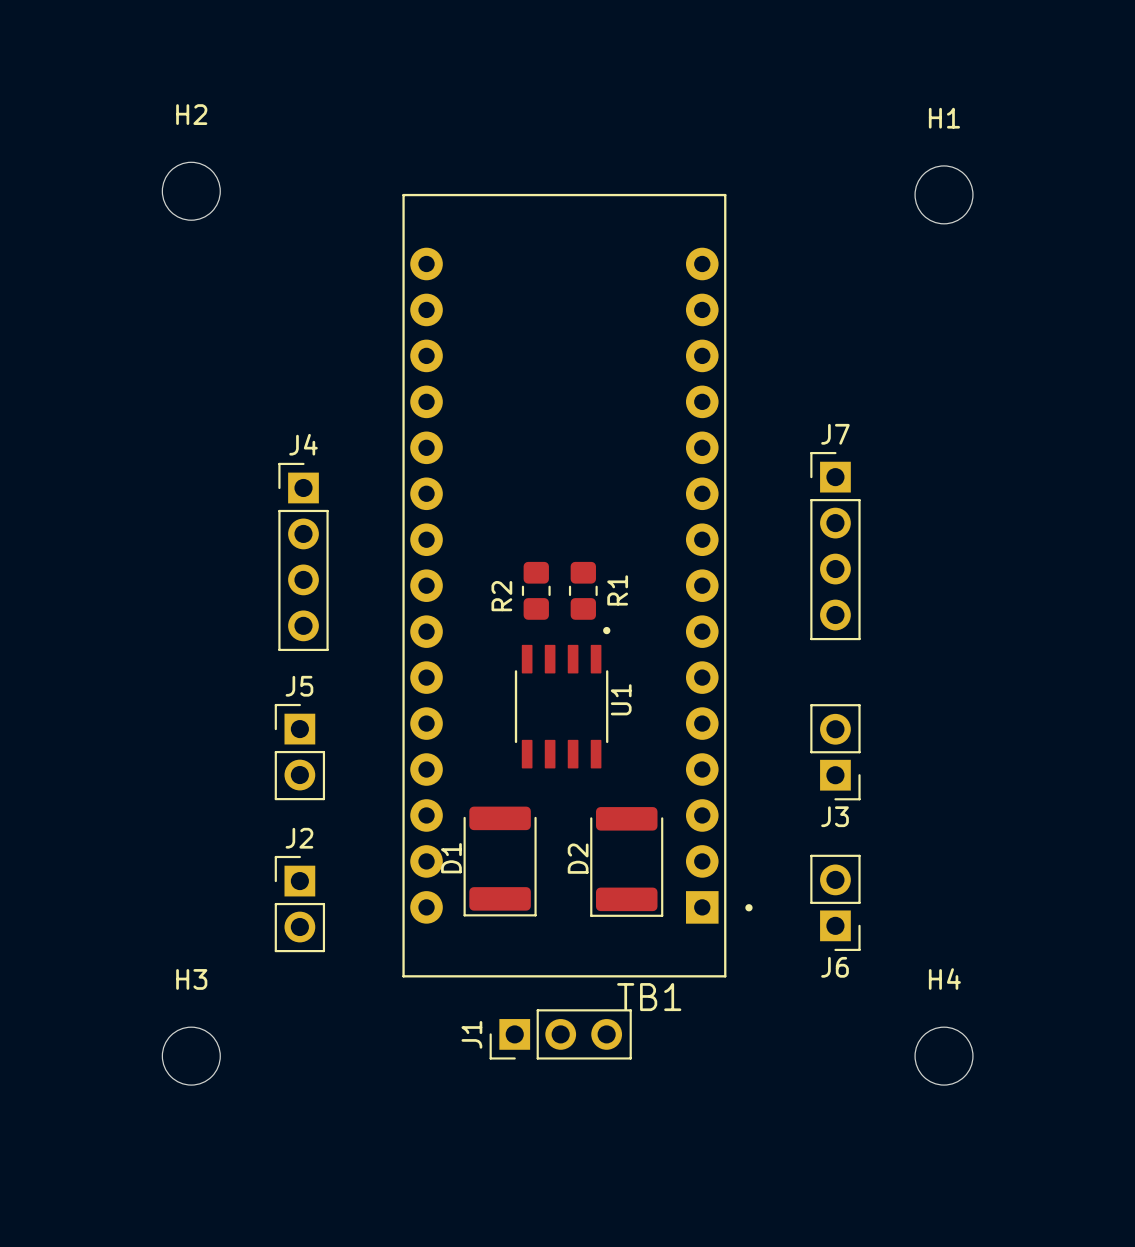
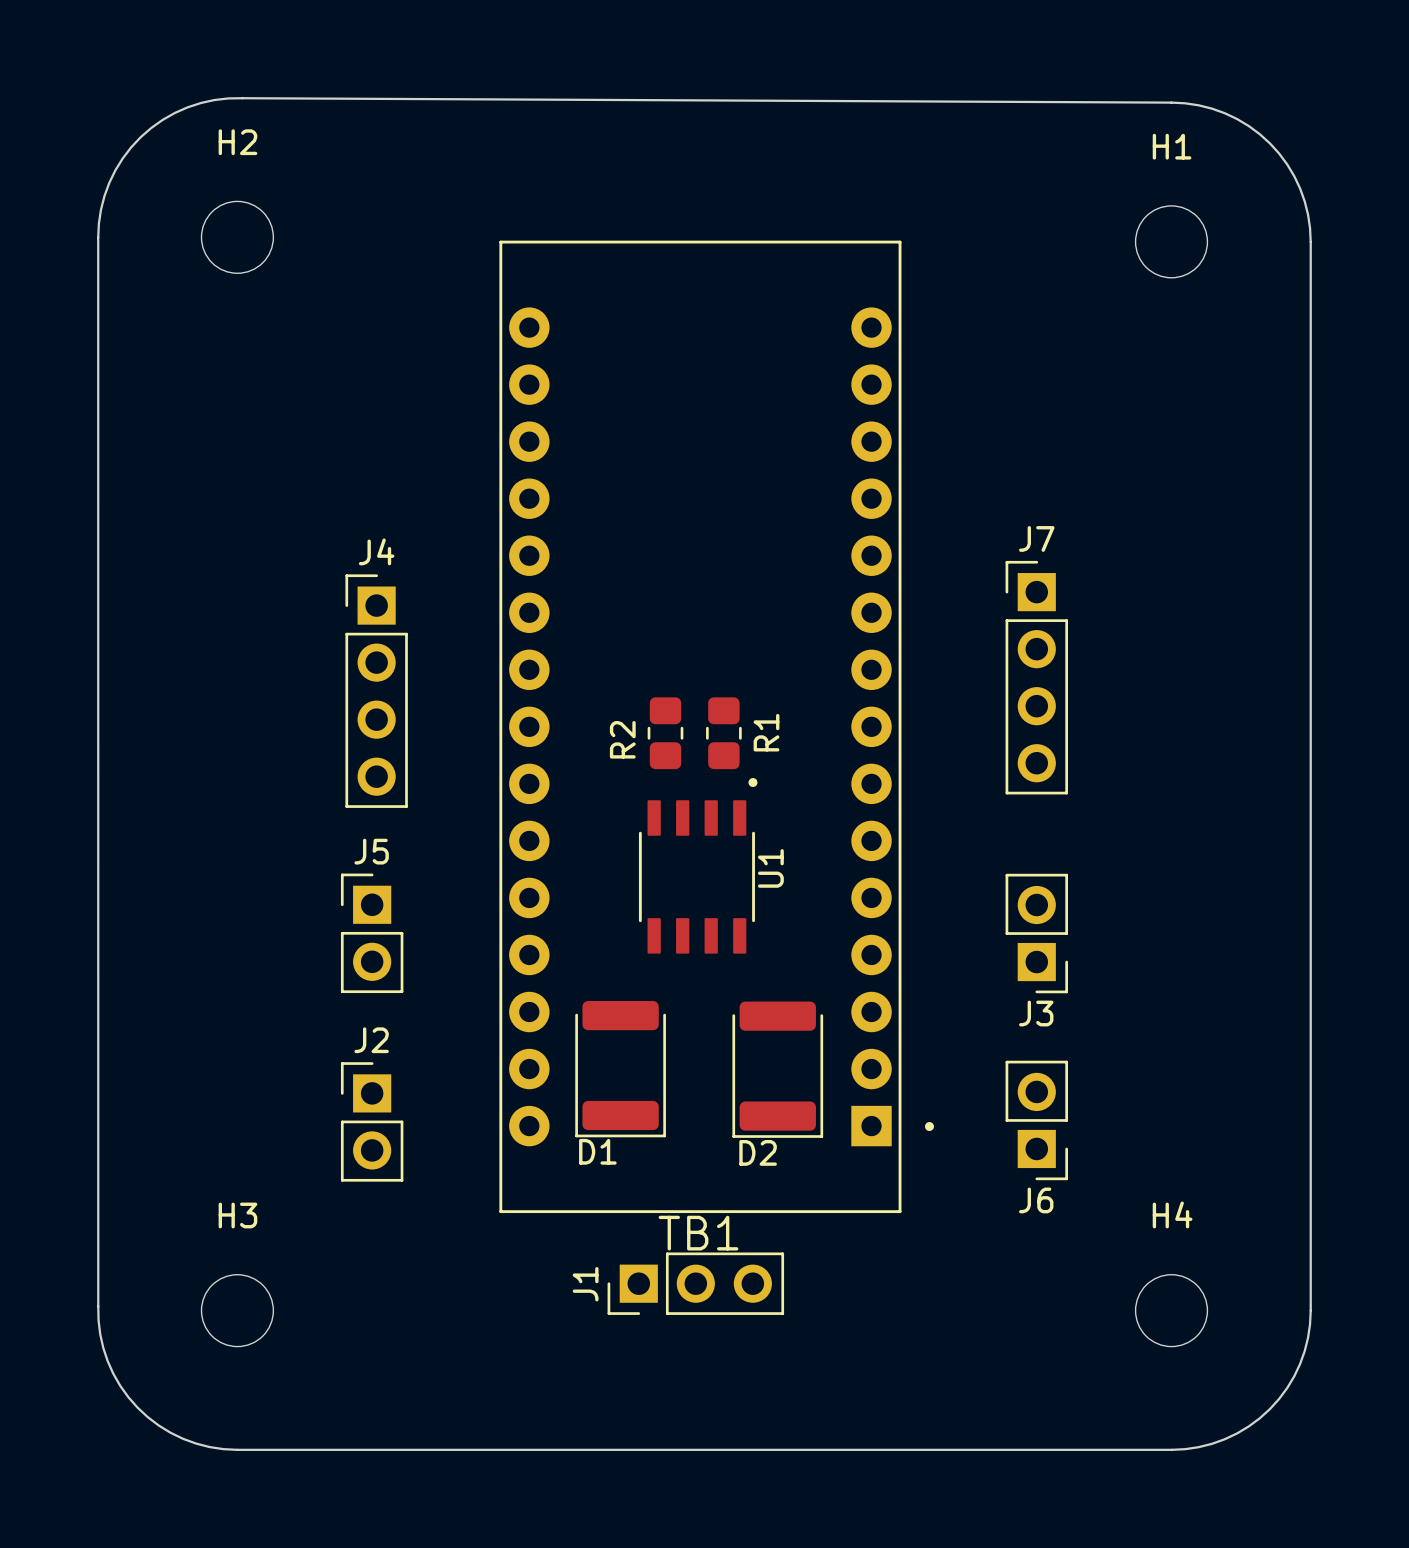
board edge: none -> (242, 98) (1185, 103) (1211, 108) (1237, 119) (1259, 134) (1279, 153) (1300, 188) (1308, 214) (1310, 241) (1310, 1310) (1308, 1337) (1300, 1363) (1279, 1398) (1259, 1418) (1237, 1433) (1211, 1443) (1171, 1449) (237, 1449) (209, 1447) (183, 1438) (147, 1417) (128, 1397) (107, 1360) (98, 1320) (98, 223) (104, 196) (115, 170) (131, 147) (151, 128) (174, 113) (200, 103) (242, 98)
D1 name rotation: 0° (451, 858) -> 90° clockwise (597, 1151)
D1 name position: D1 (451, 858) -> D1 (597, 1151)
D2 name rotation: 0° (578, 858) -> 90° clockwise (758, 1152)
D2 name position: D2 (578, 858) -> D2 (758, 1152)
TB1 name position: TB1 (649, 997) -> TB1 (698, 1233)

